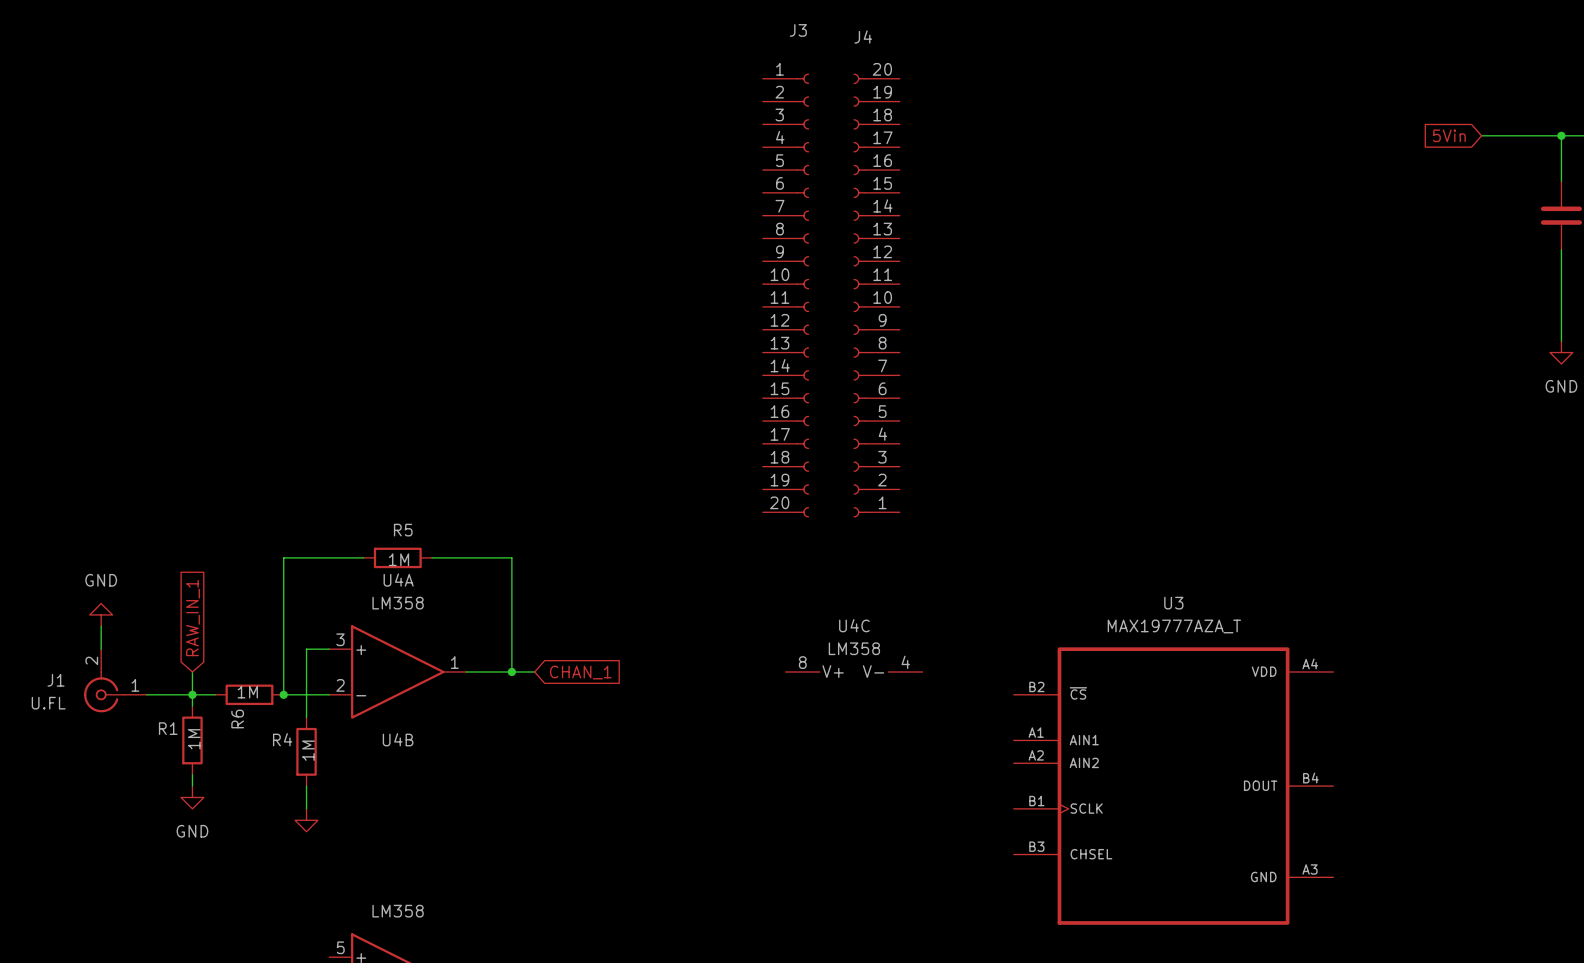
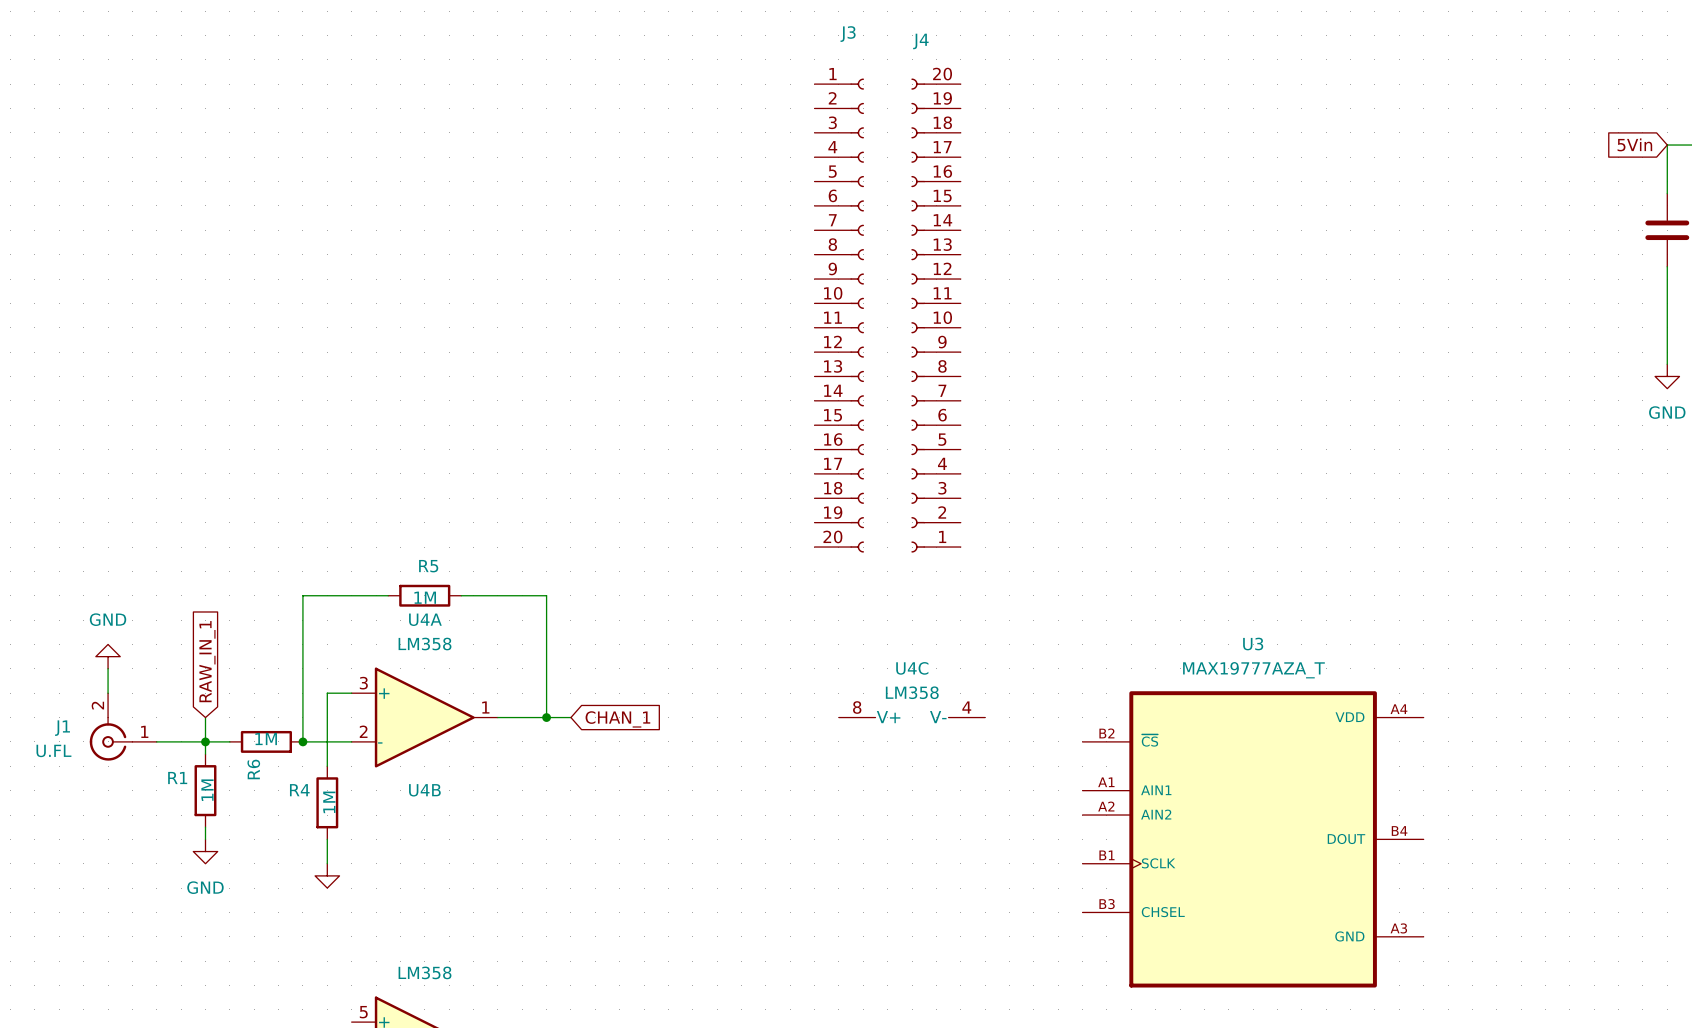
global label position: 5Vin (1449, 135) -> 5Vin (1634, 144)
wire: (1481, 135) (1561, 135) -> none
junction: (1561, 135) -> none

